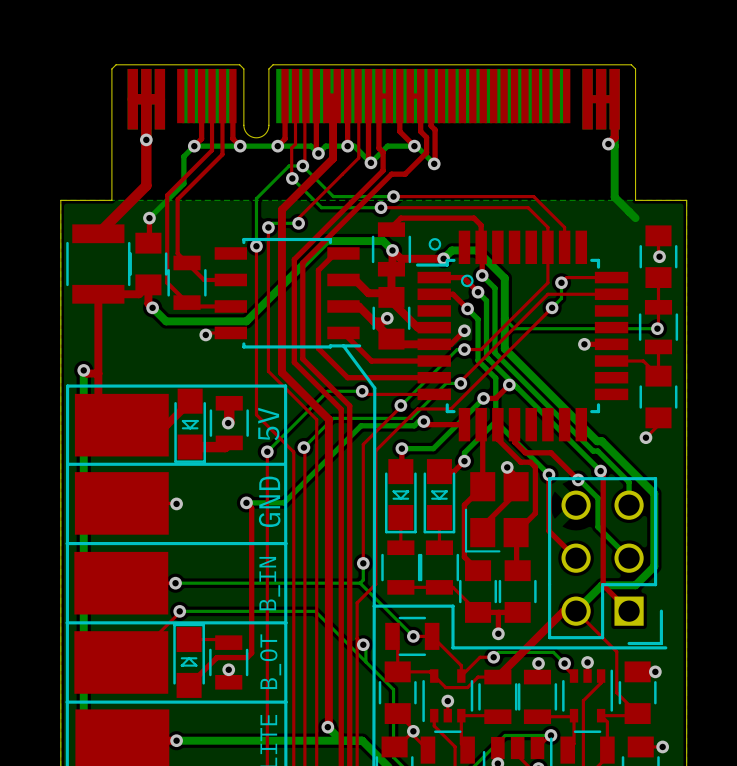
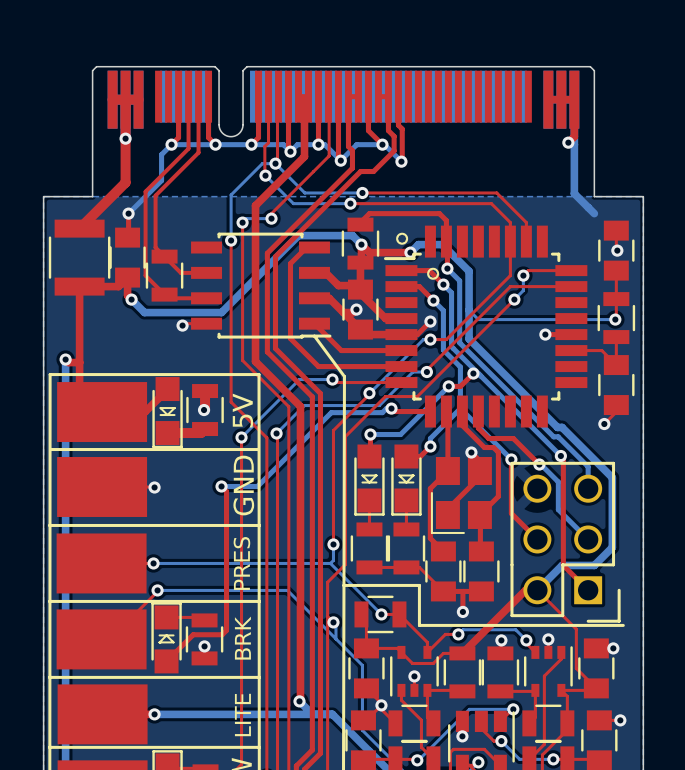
part value: B_IN (269, 583) -> PRES (241, 563)
part value: B_OT (270, 661) -> BRK (242, 638)

